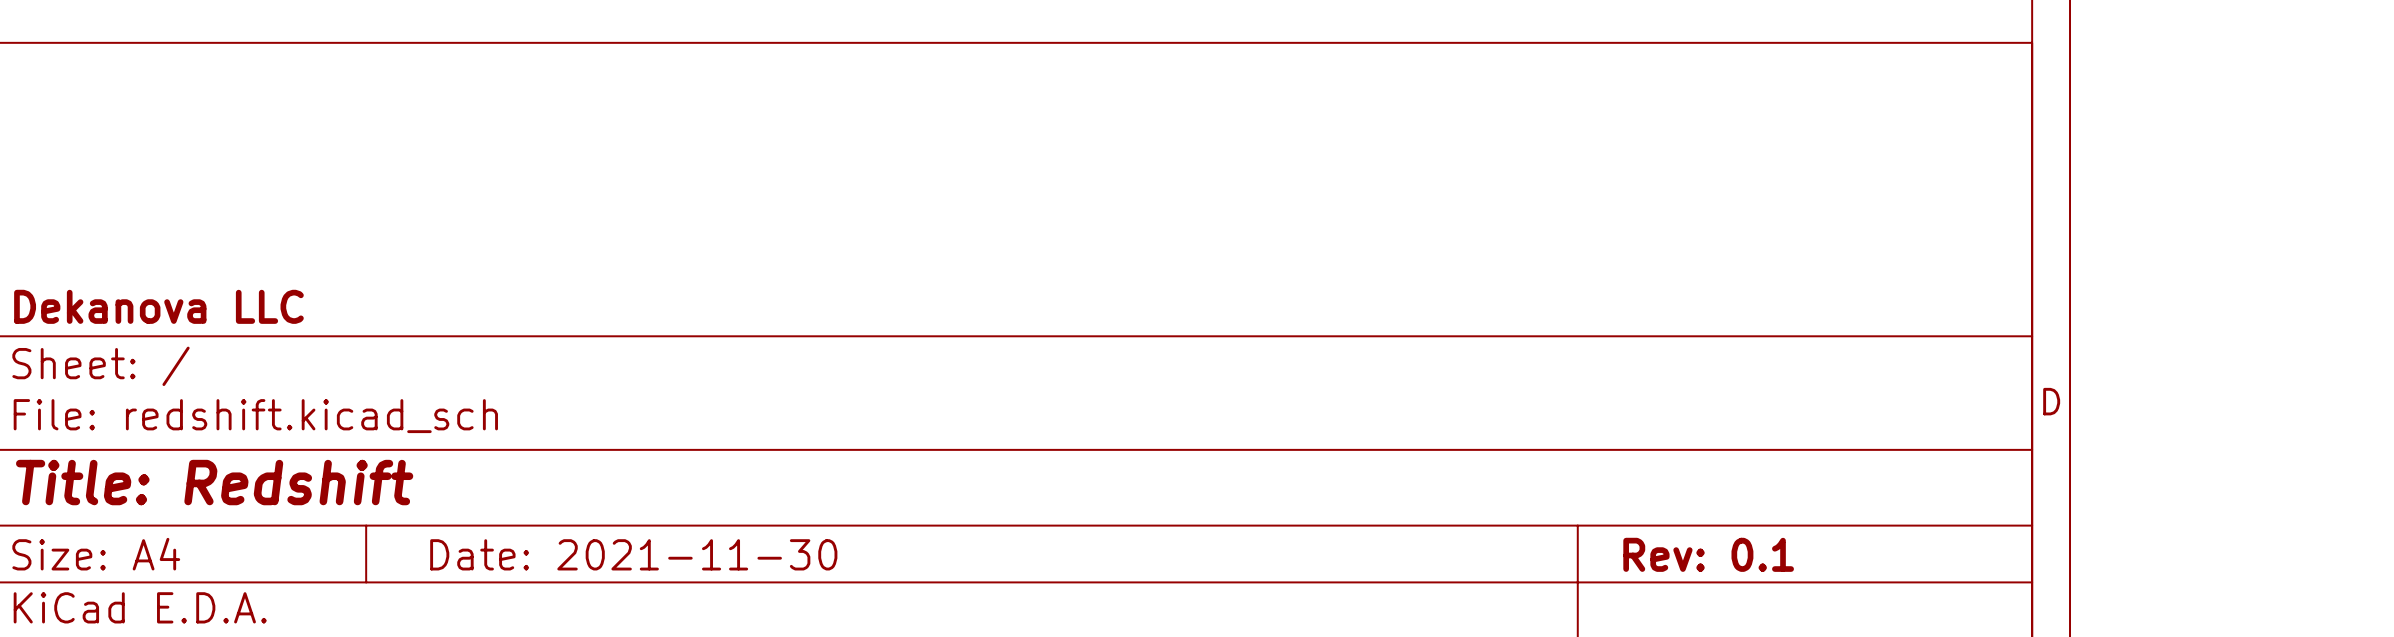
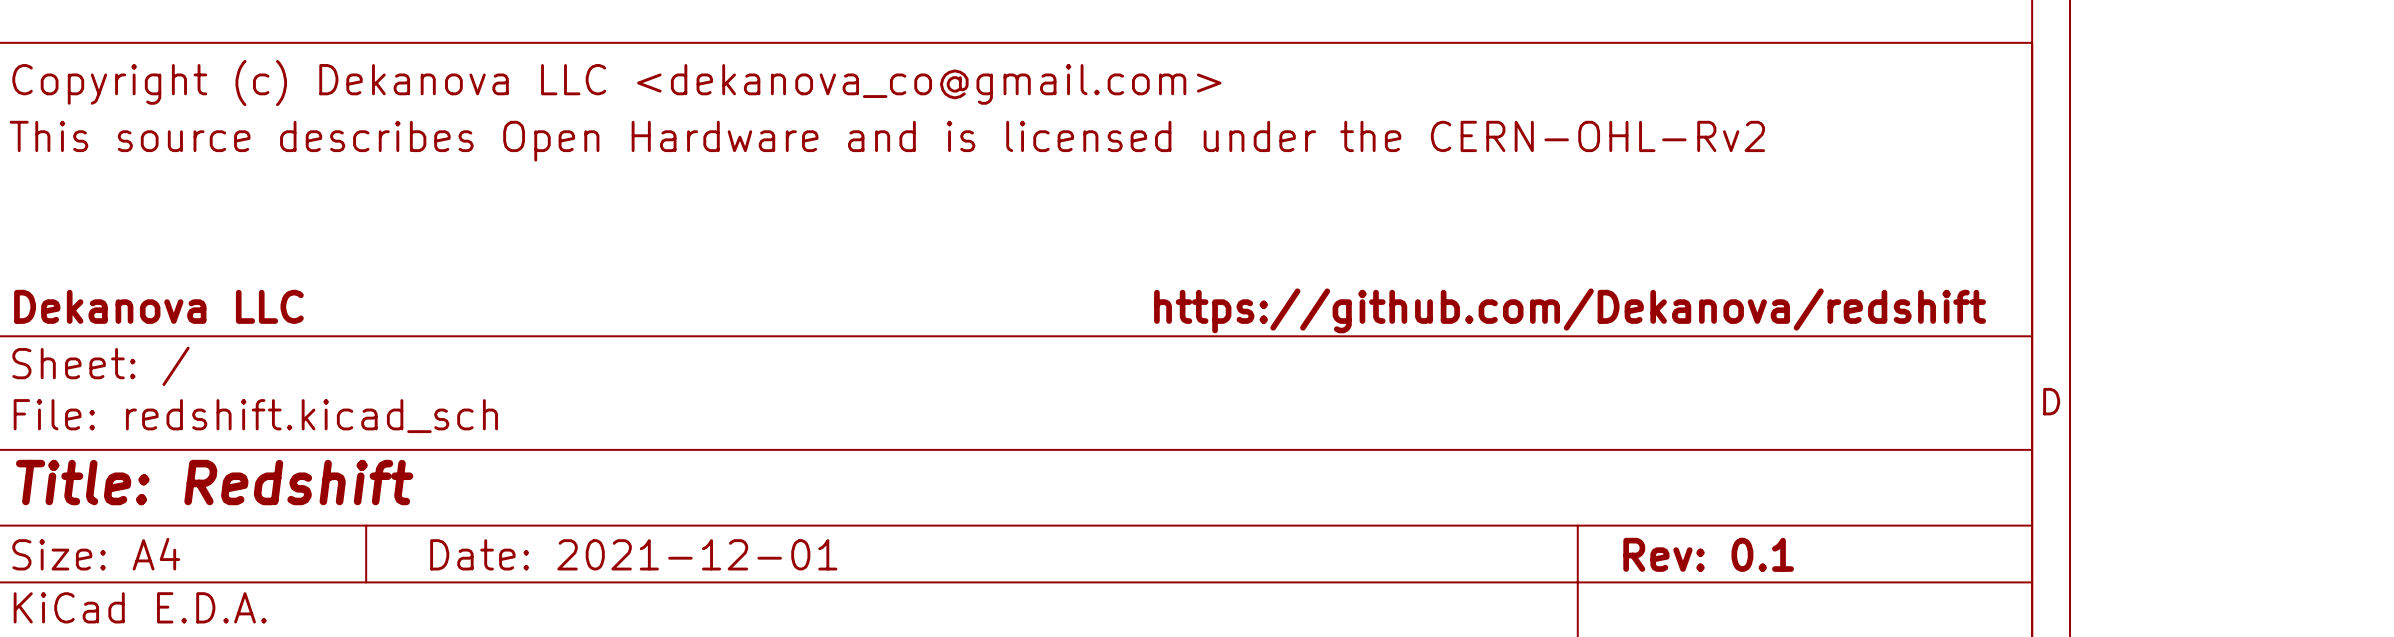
title block: none -> Copyright (c) Dekanova LLC <dekanova_co@gmail.com> (616, 83)
title block: none -> This source describes Open Hardware and is licensed under the CERN-OHL-Rv2 (887, 141)
title block: Dekanova LLC (158, 306) -> Dekanova LLC https://github.com/Dekanova/redshift (1000, 310)
title block: Date: 2021-11-30 (633, 554) -> Date: 2021-12-01 (633, 554)

